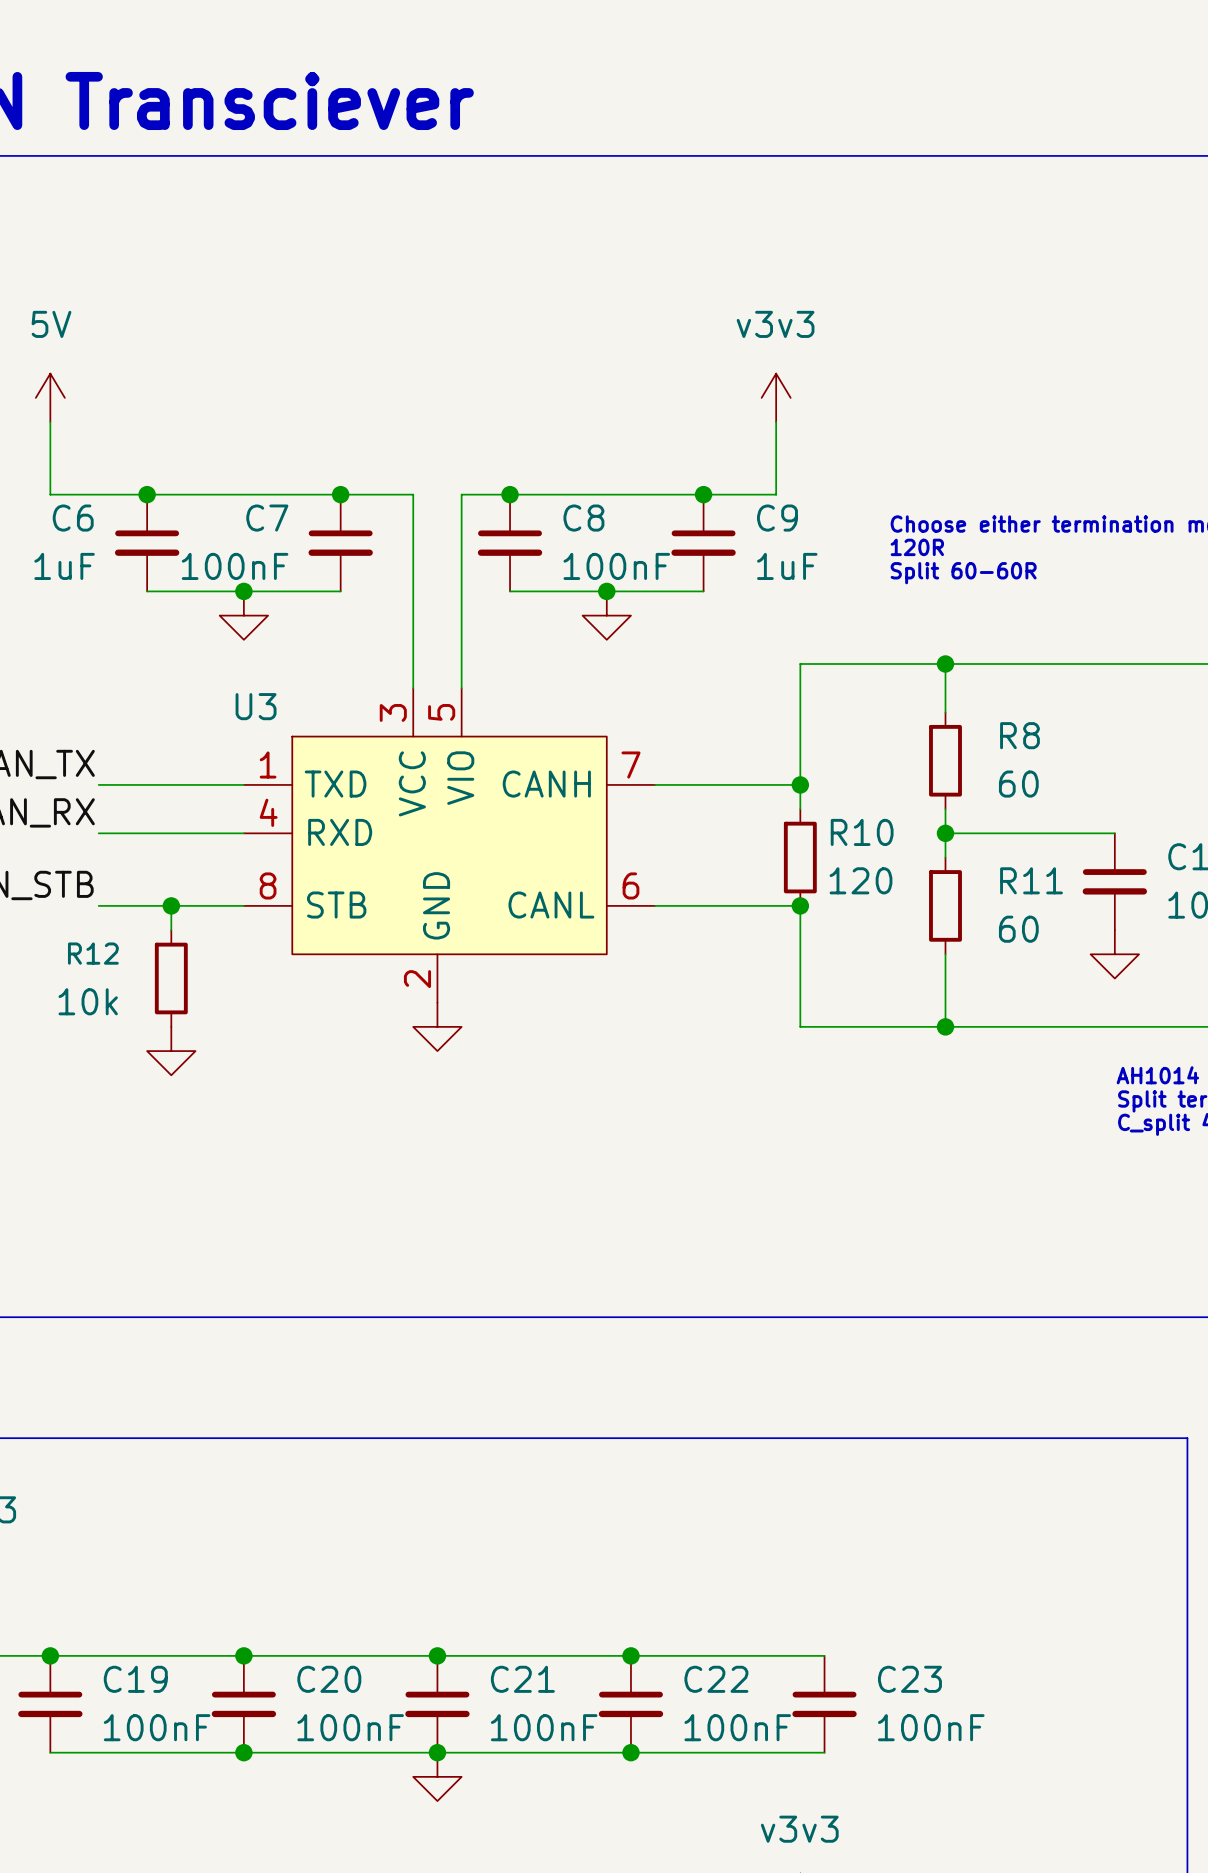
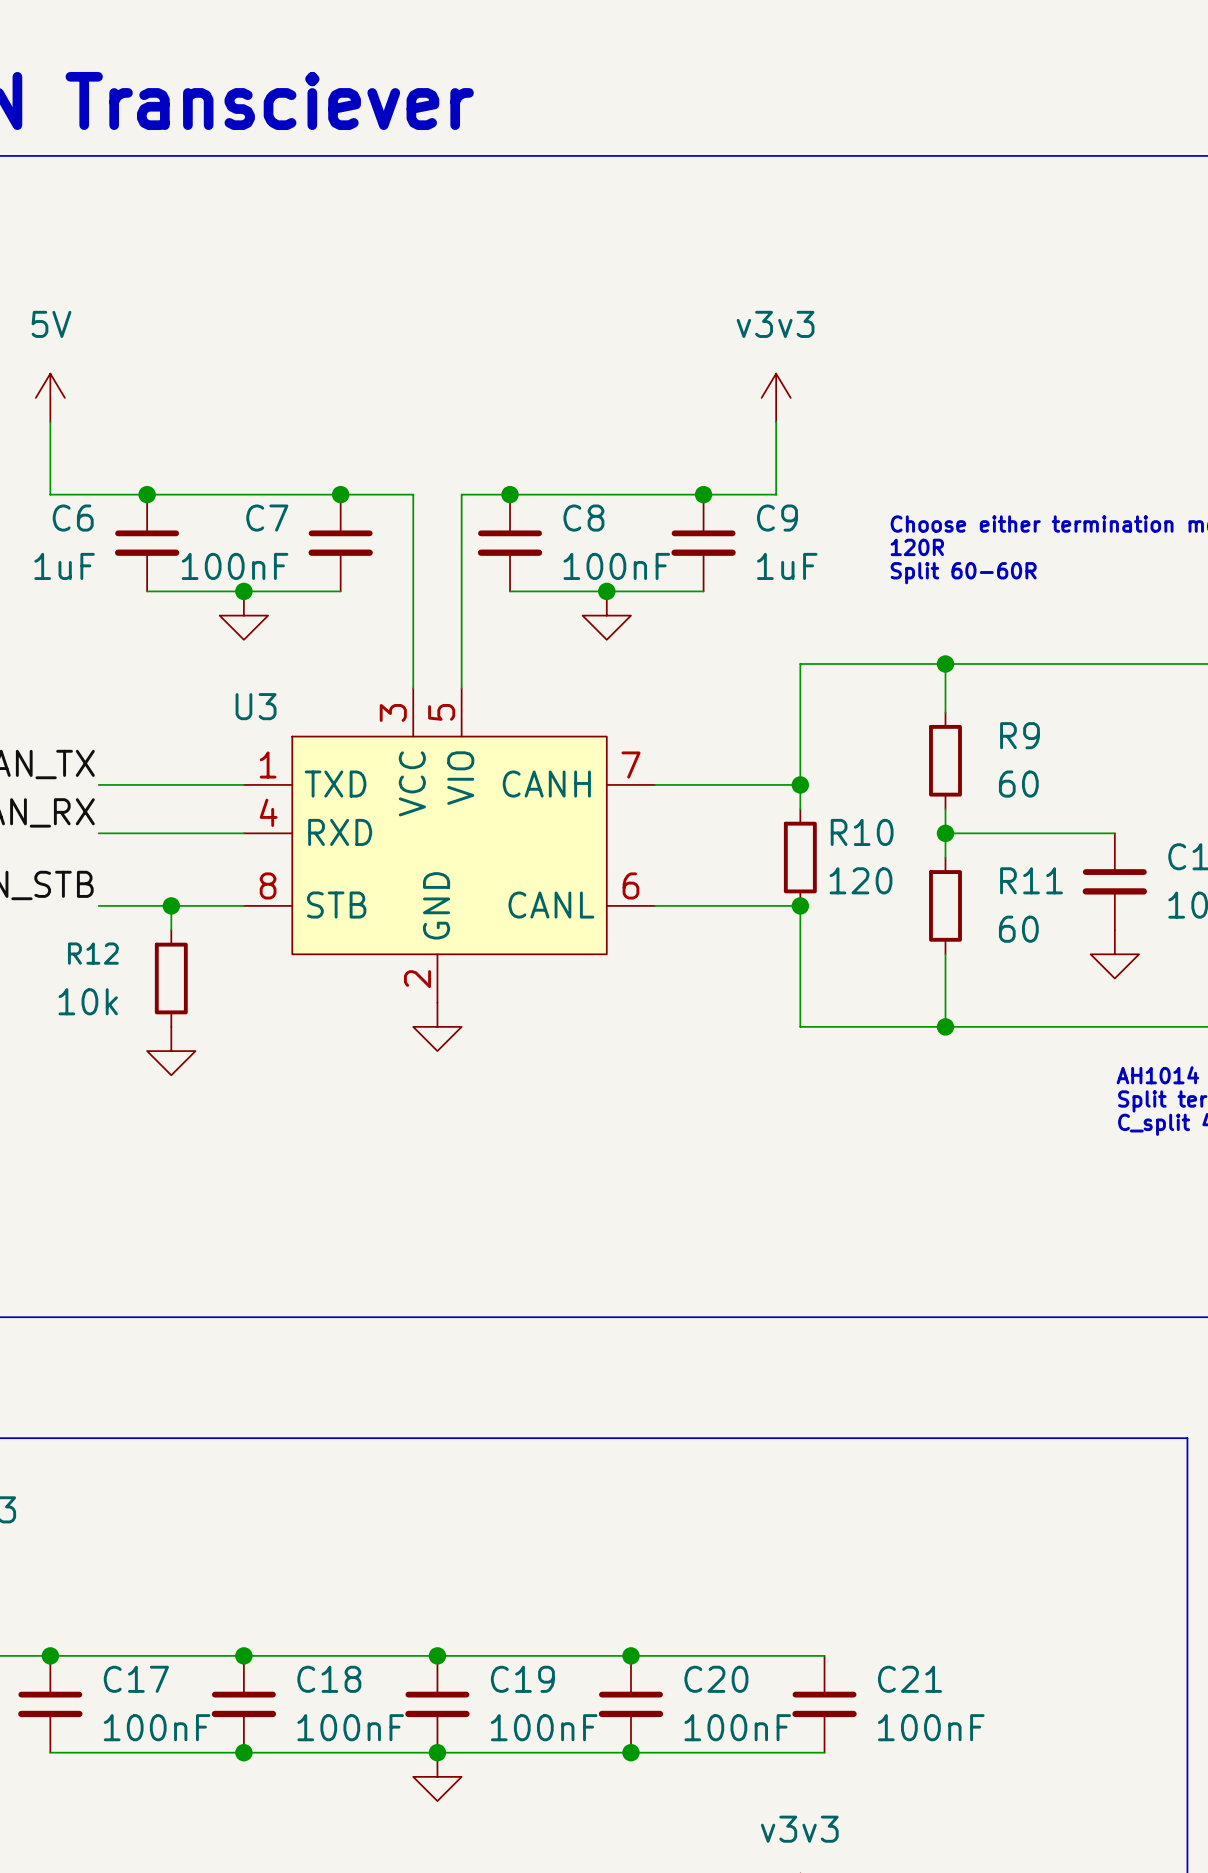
R8 name: R8 (1019, 735) -> R9 (1019, 735)
C19 name: C19 (135, 1679) -> C17 (136, 1679)
C20 name: C20 (329, 1679) -> C18 (329, 1679)
C21 name: C21 (522, 1679) -> C19 (522, 1679)
C22 name: C22 (716, 1679) -> C20 (716, 1679)
C23 name: C23 (909, 1679) -> C21 (909, 1679)

